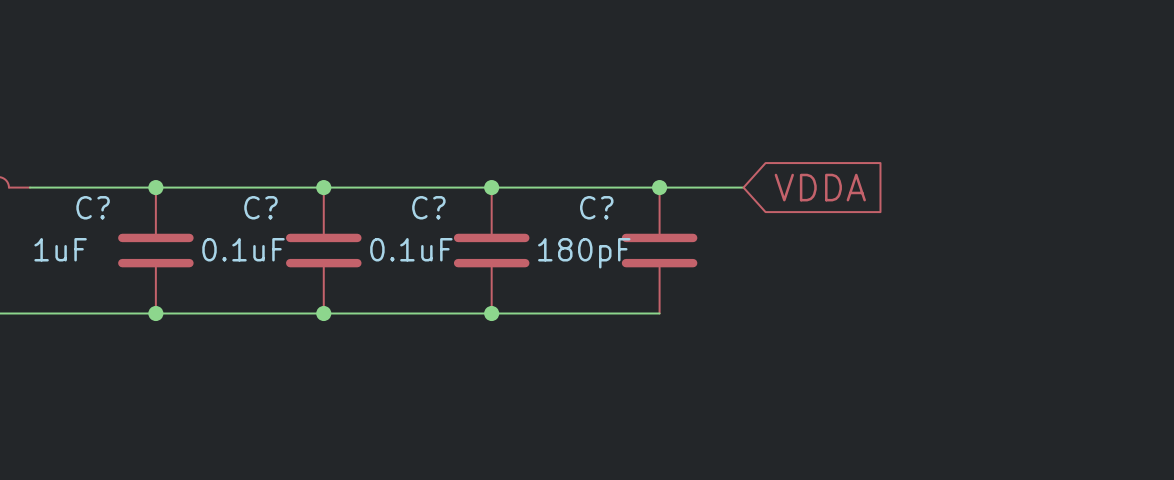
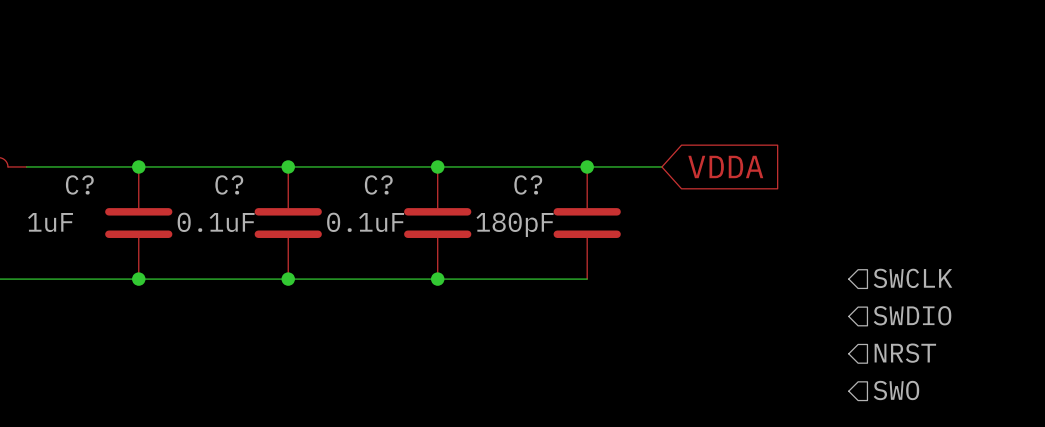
hierarchical label: none -> SWCLK (912, 278)
hierarchical label: none -> SWDIO (912, 315)
hierarchical label: none -> NRST (905, 353)
hierarchical label: none -> SWO (896, 390)

